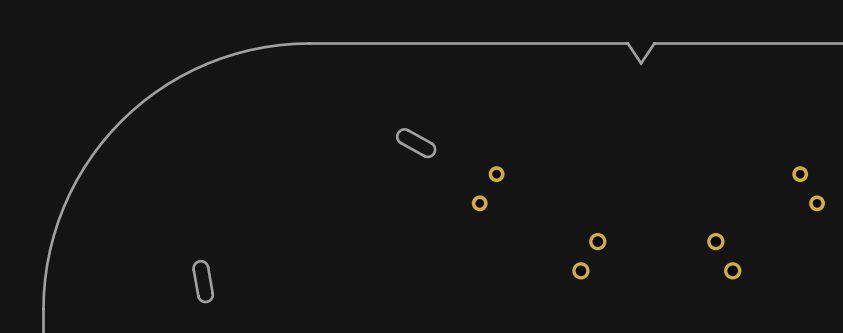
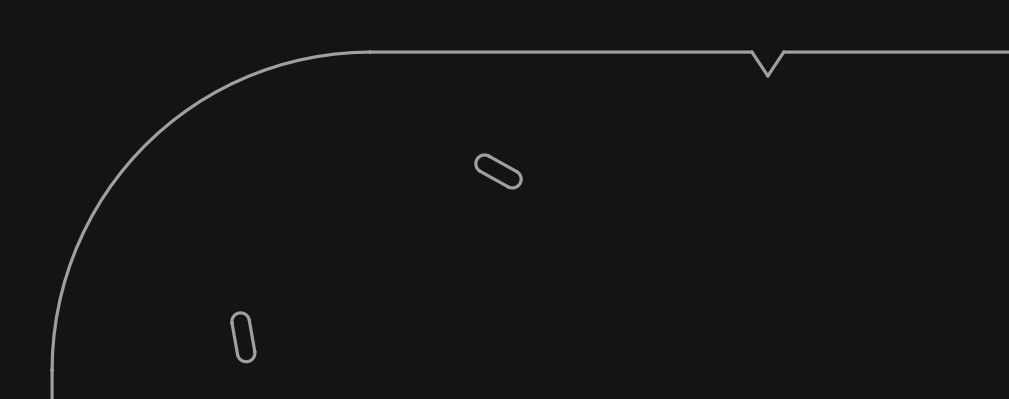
part: (488, 188) -> none
part: (808, 188) -> none
part: (589, 256) -> none
part: (724, 256) -> none

